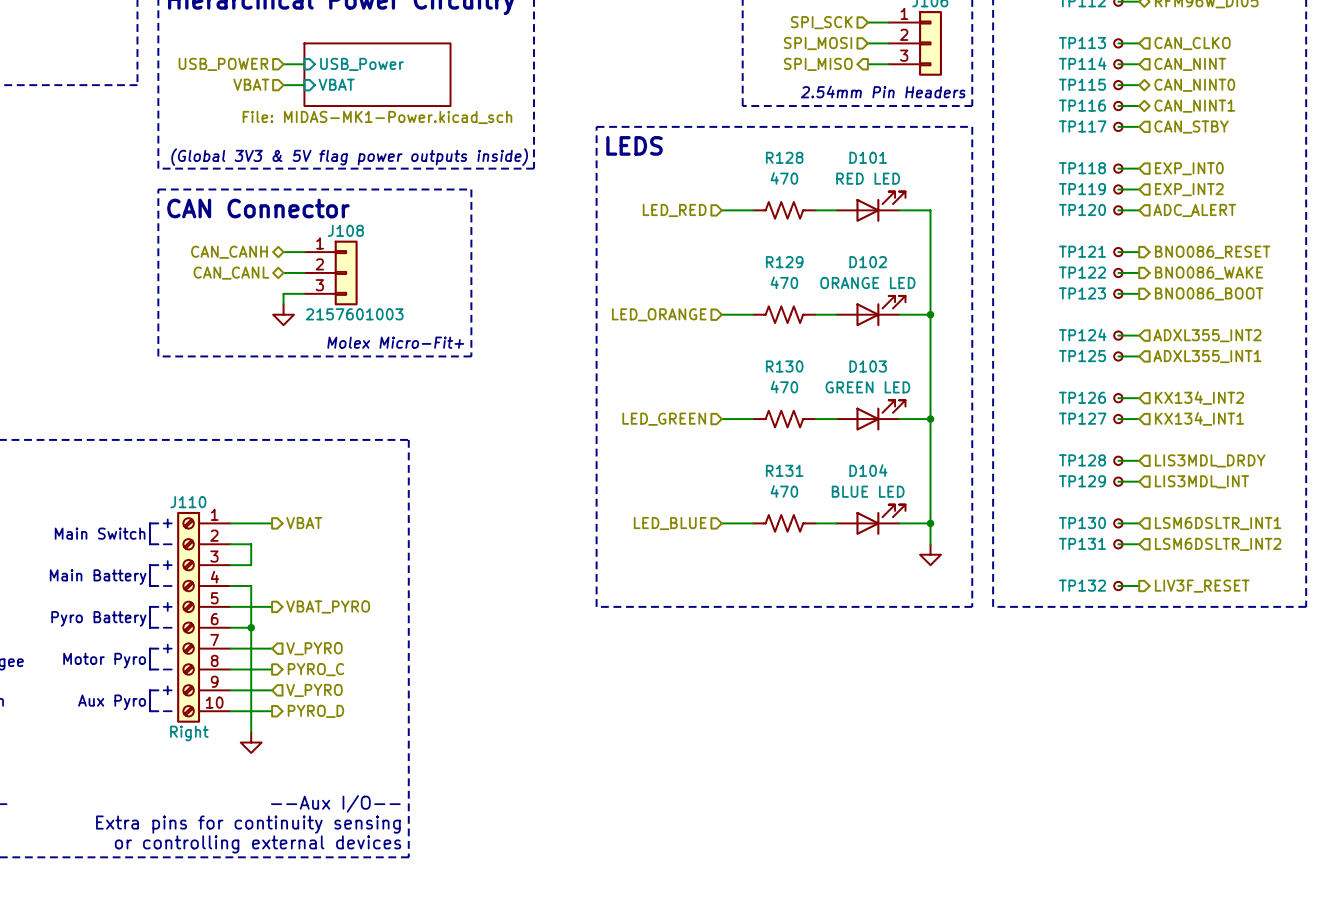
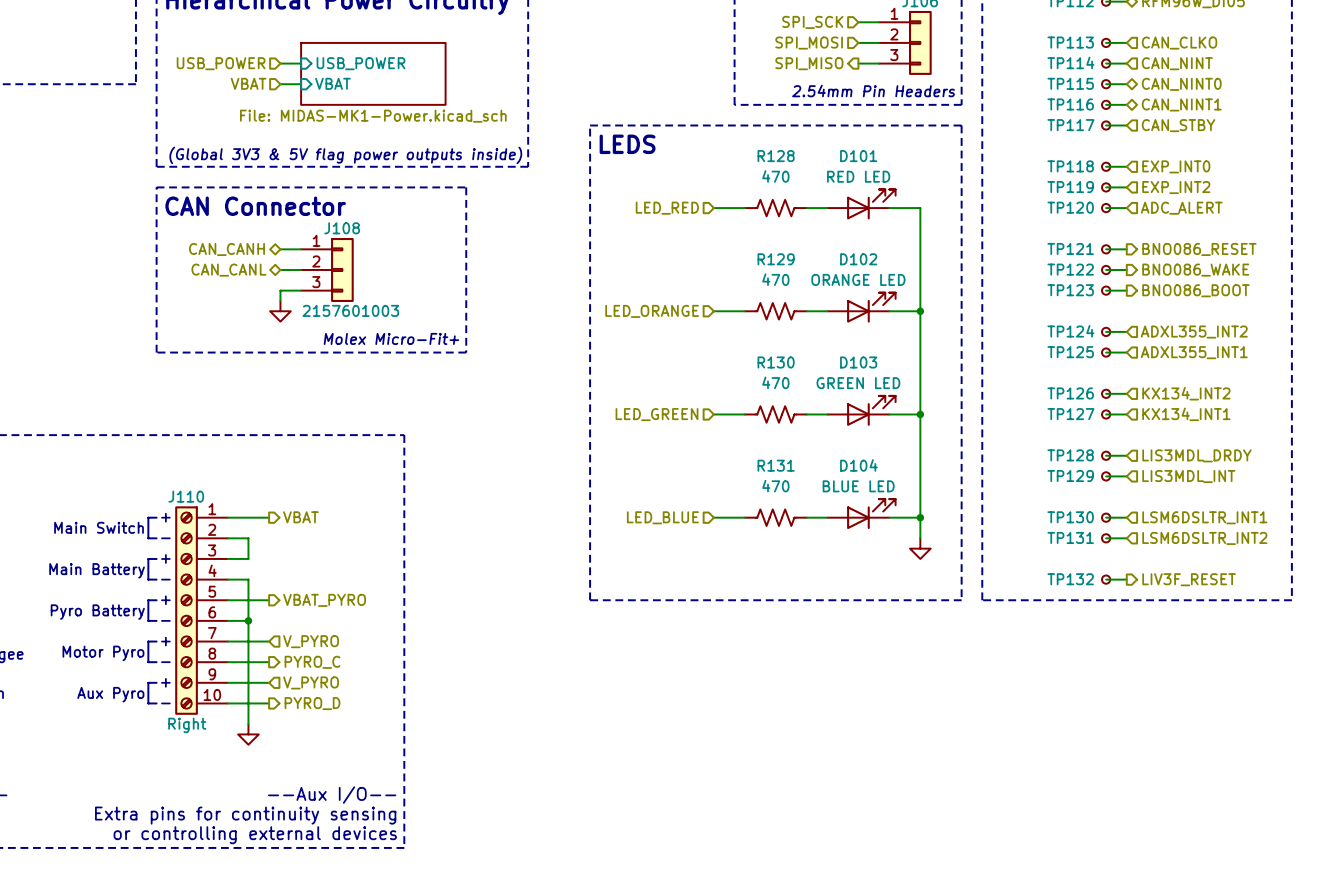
sheet pin: USB_Power (361, 64) -> USB_POWER (360, 63)

